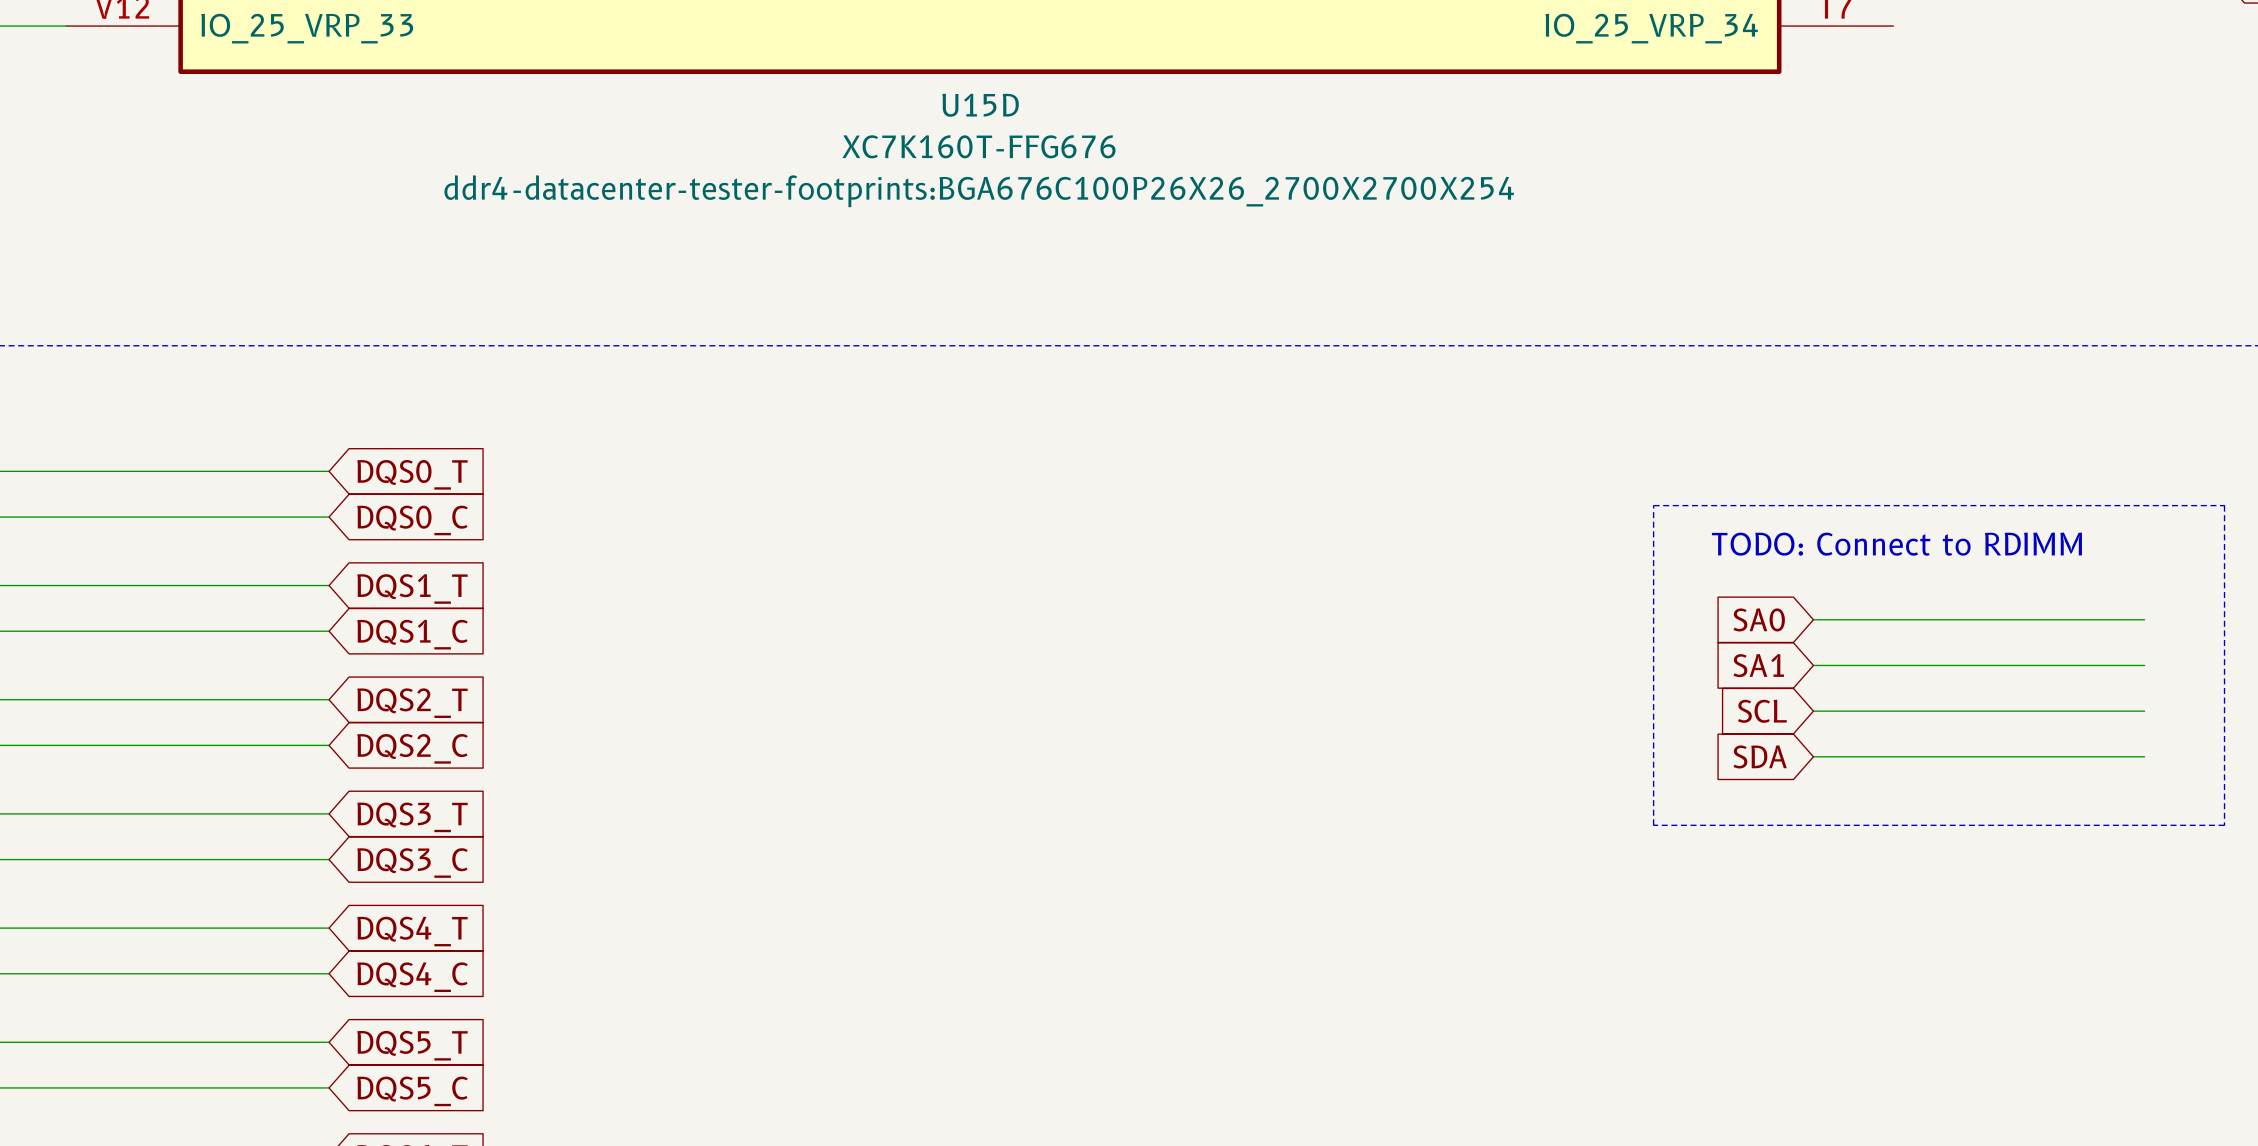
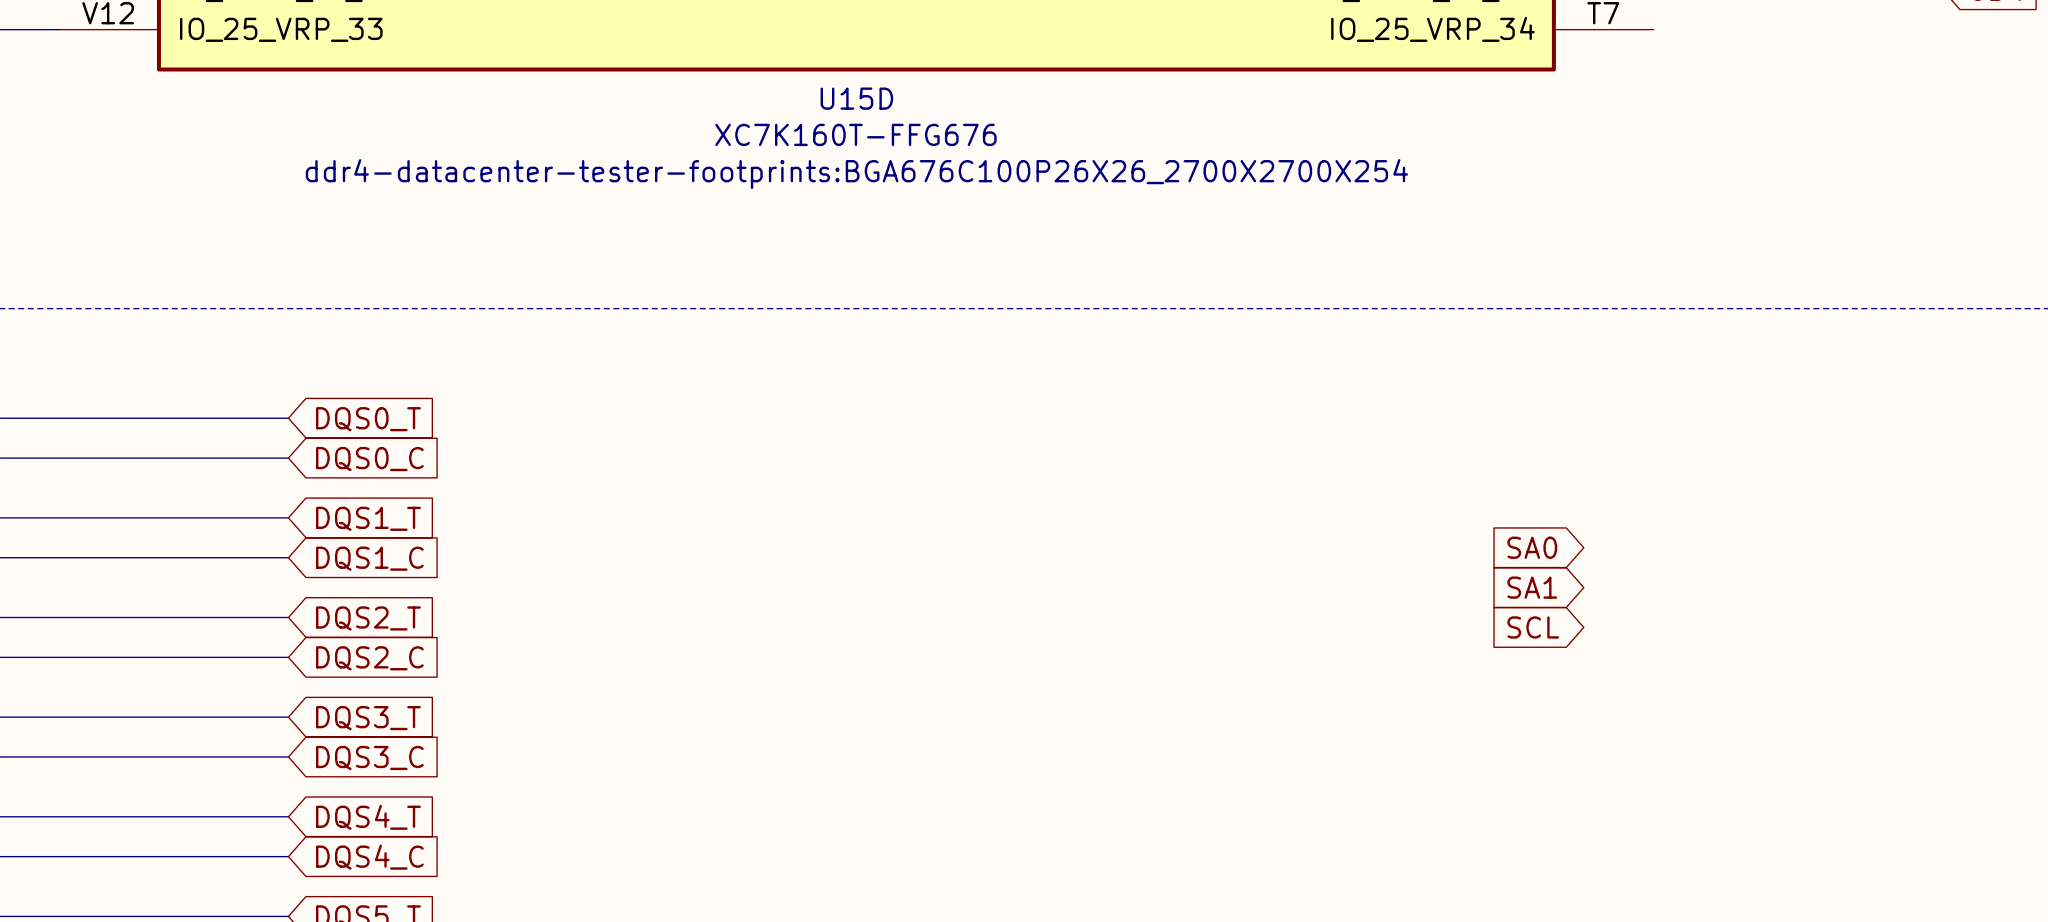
line: (1653, 505) (1653, 825) (2224, 825) (2224, 505) (1653, 505) -> none
text: TODO: Connect to RDIMM (1896, 544) -> none
wire: (1813, 619) (2144, 619) -> none
wire: (1813, 665) (2144, 665) -> none
wire: (1813, 711) (2144, 711) -> none
global label: SDA (1760, 756) -> none
wire: (1813, 756) (2144, 756) -> none

